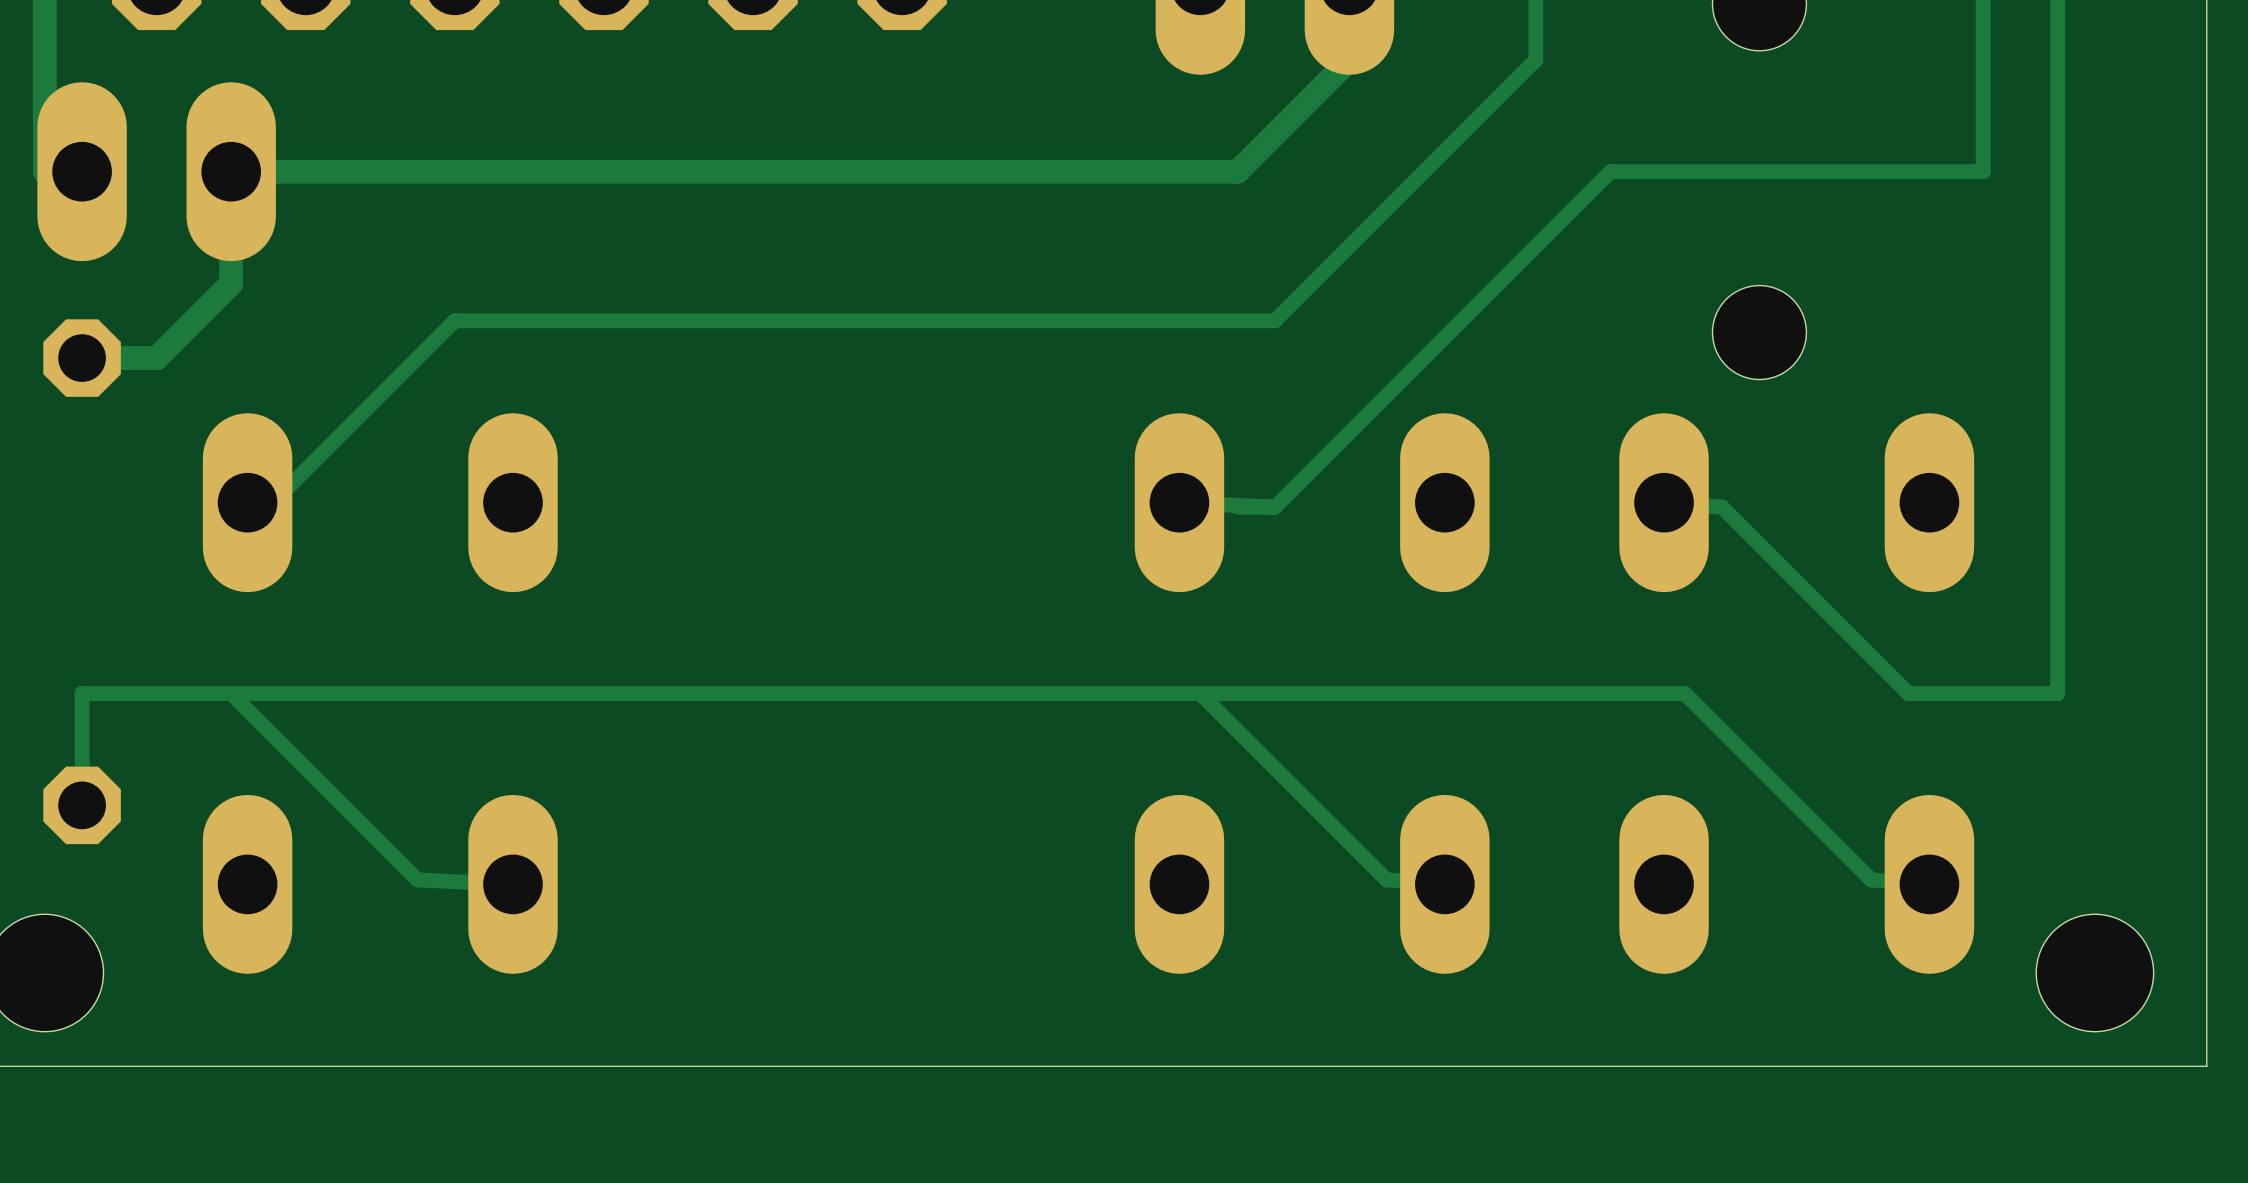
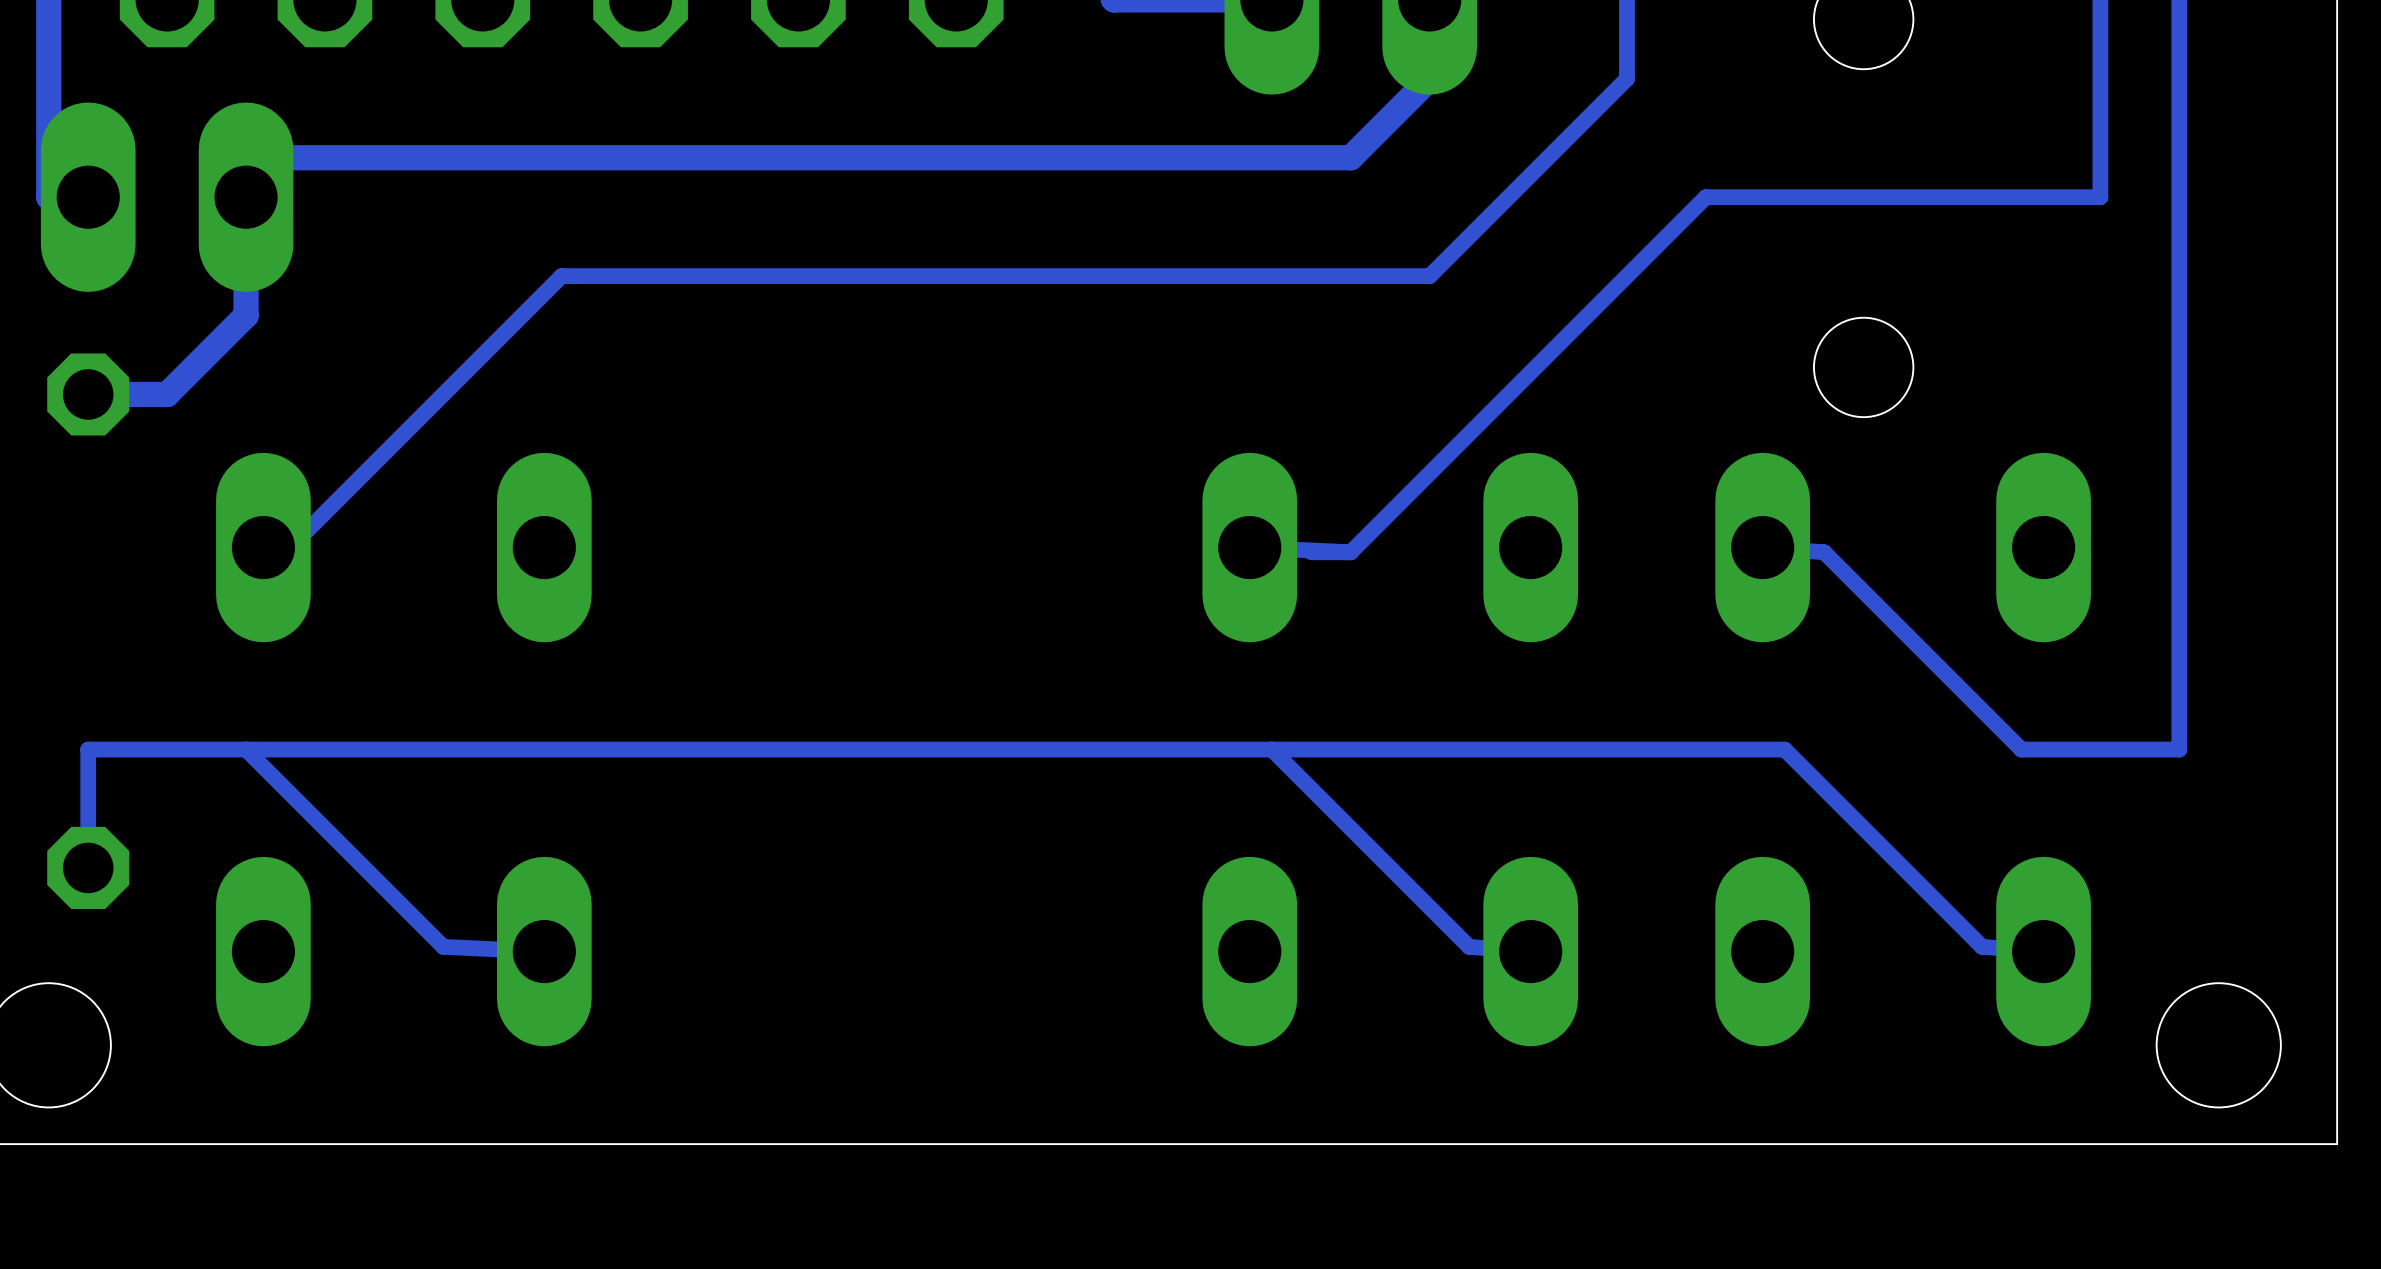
track: (1274, 134) (1237, 171) (231, 171) -> (1350, 157) (246, 157) (246, 197)
track: (1349, 246) (1274, 320) (454, 320) -> (1429, 276) (561, 276) (482, 355)

